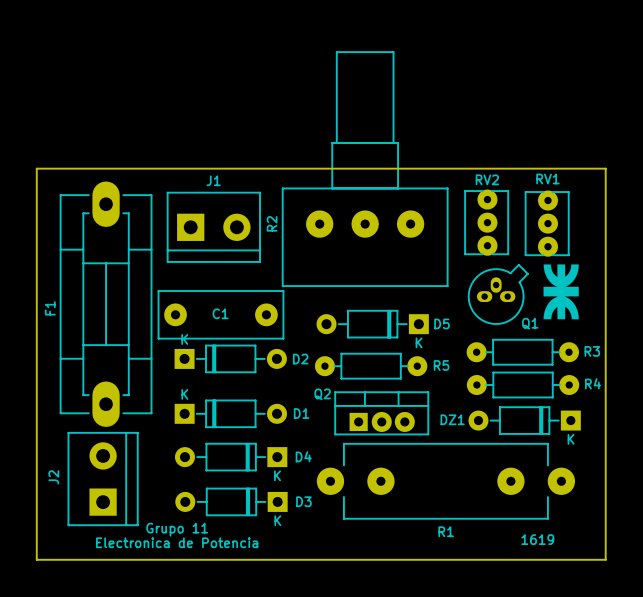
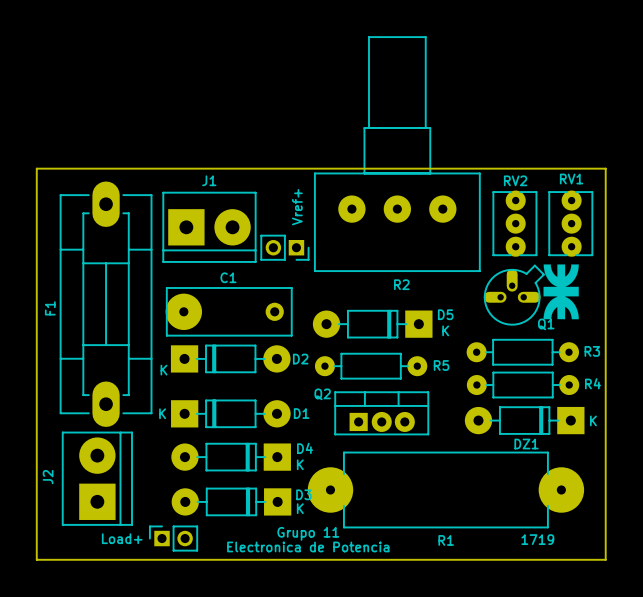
R2 position: (365, 169) -> (397, 154)
J1 footprint: [167, 192, 261, 263] -> [162, 192, 257, 263]
RV2 position: (486, 222) -> (514, 223)
R2 name rotation: 0° (272, 223) -> 90° clockwise (401, 284)
R2 name position: R2 (272, 223) -> R2 (401, 284)
RV1 position: (547, 223) -> (570, 223)
Vref+: none -> (284, 247)
Q1 footprint: [468, 264, 529, 325] -> [483, 265, 545, 326]
C1 footprint: [157, 290, 284, 340] -> [165, 287, 293, 337]
D5 footprint: [316, 310, 429, 339] -> [312, 310, 433, 339]
C1 name position: C1 (220, 313) -> C1 (228, 277)
D2 footprint: [174, 345, 287, 373] -> [170, 345, 291, 373]
D1 footprint: [174, 399, 288, 428] -> [171, 399, 291, 428]
DZ1 footprint: [468, 406, 581, 435] -> [464, 406, 585, 435]
DZ1 name position: DZ1 (452, 419) -> DZ1 (526, 444)
J2 footprint: [67, 432, 139, 526] -> [62, 431, 133, 526]
D4 footprint: [174, 443, 288, 472] -> [171, 443, 291, 472]
R1 footprint: [316, 443, 576, 520] -> [307, 451, 585, 528]
D3 footprint: [175, 488, 288, 516] -> [171, 488, 292, 516]
text position: Grupo 11 (177, 529) -> Grupo 11 (308, 533)
Load+: none -> (173, 538)
text: 1619 (537, 539) -> 1719 (537, 539)
text position: Electronica de Potencia (177, 542) -> Electronica de Potencia (308, 546)

